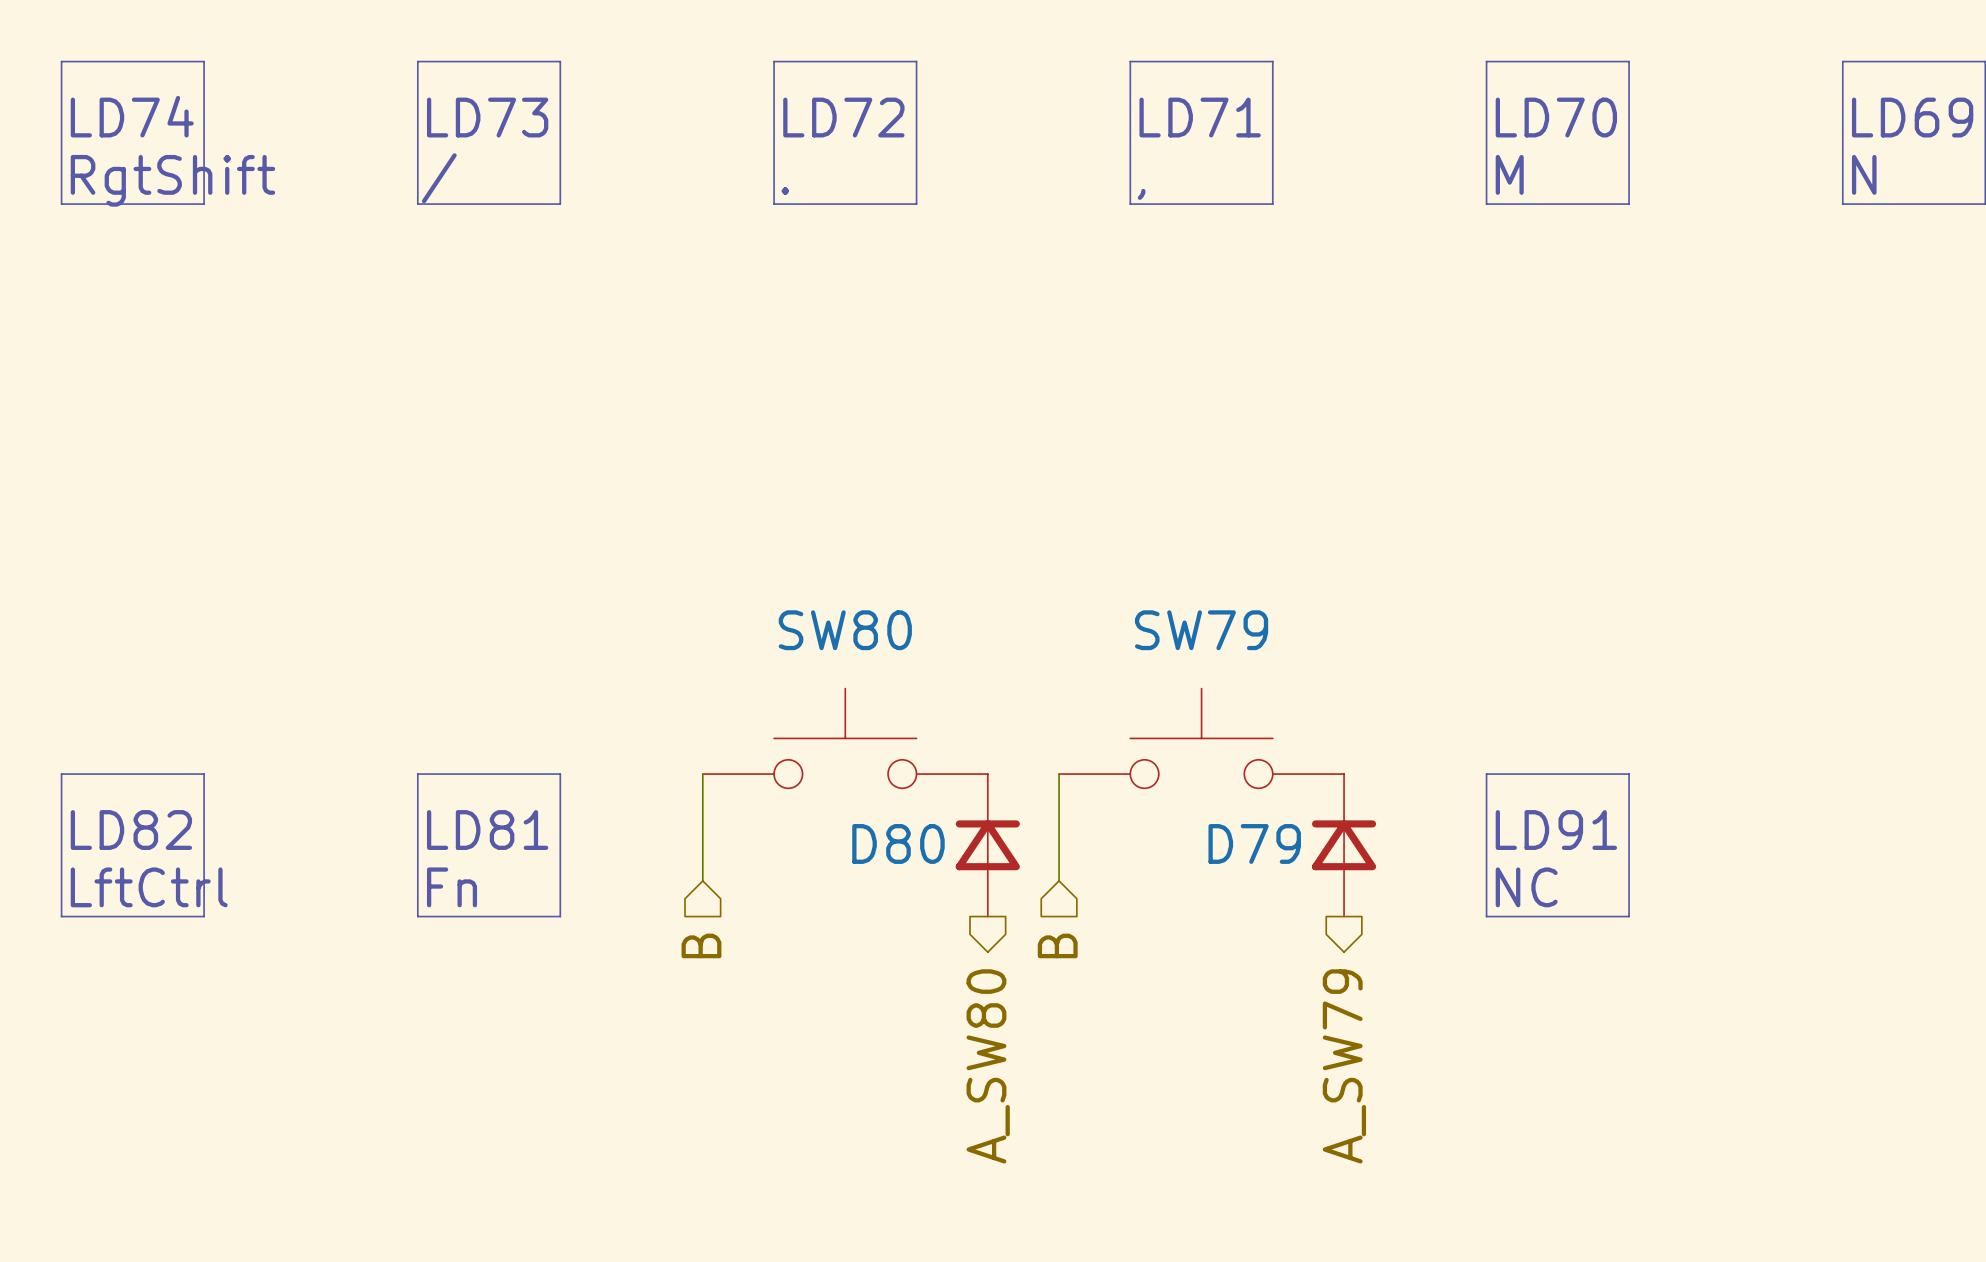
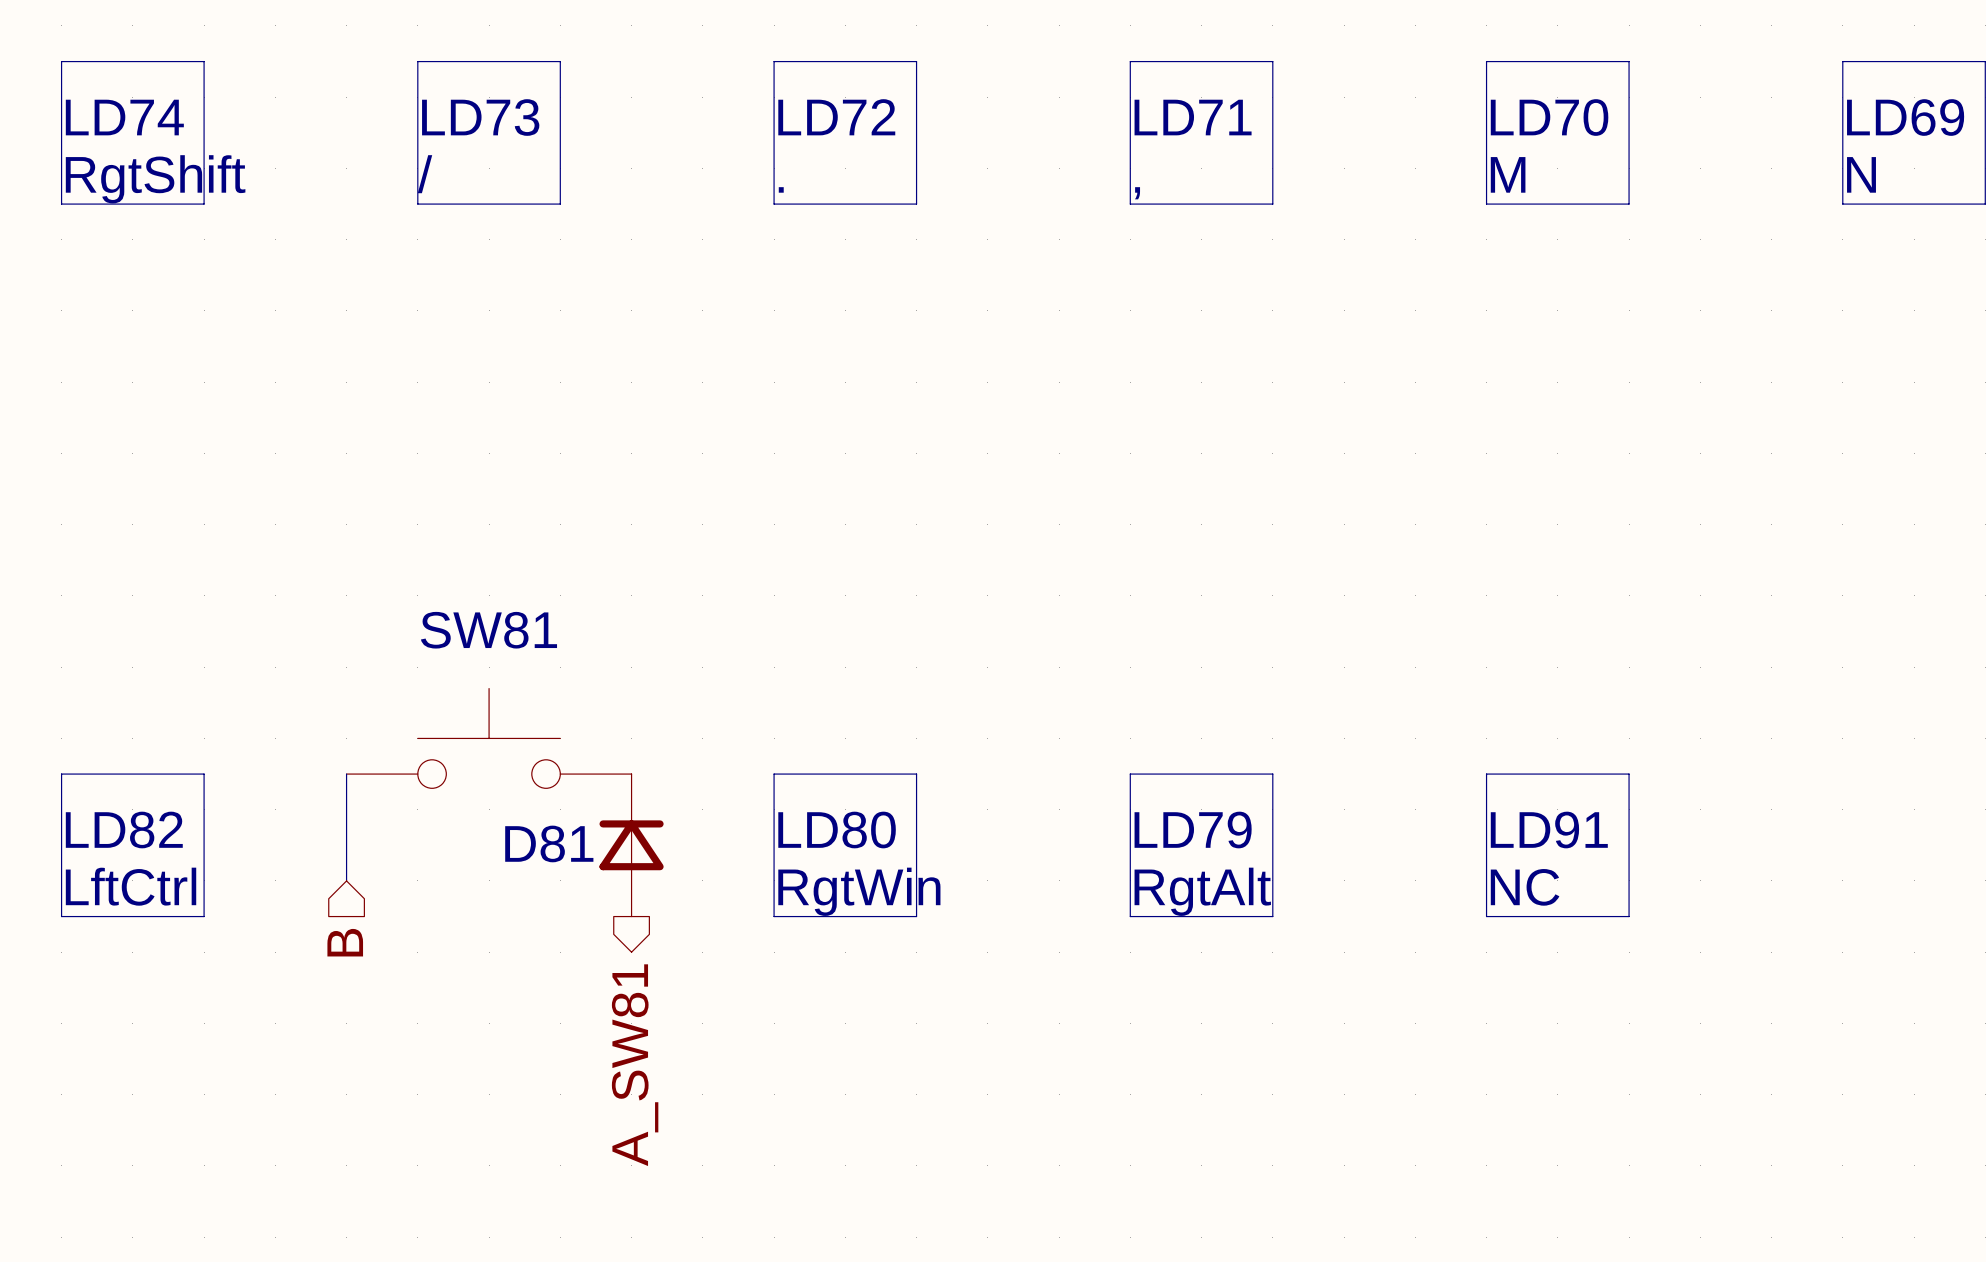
SW81: none -> (489, 738)
SW80: (845, 738) -> none
SW79: (1201, 738) -> none
line: (417, 774) (560, 774) (560, 916) (417, 916) (417, 774) -> (774, 774) (916, 774) (916, 916) (774, 916) (774, 774)
wire: (702, 774) (702, 880) -> (346, 774) (346, 880)
wire: (1059, 774) (1059, 880) -> none
line: none -> (1130, 774) (1272, 774) (1272, 916) (1130, 916) (1130, 774)
text: LD81 (487, 830) -> none
text: none -> LD80 (837, 830)
text: none -> LD79 (1193, 830)
D81: none -> (631, 845)
D80: (987, 845) -> none
D79: (1344, 845) -> none
text: Fn (452, 887) -> none
text: none -> RgtWin (859, 891)
text: none -> RgtAlt (1202, 891)
hierarchical label: none -> B (345, 942)
hierarchical label: B (701, 945) -> none
hierarchical label: B (1057, 945) -> none
hierarchical label: none -> A_SW81 (635, 1065)
hierarchical label: A_SW80 (988, 1066) -> none
hierarchical label: A_SW79 (1344, 1066) -> none

